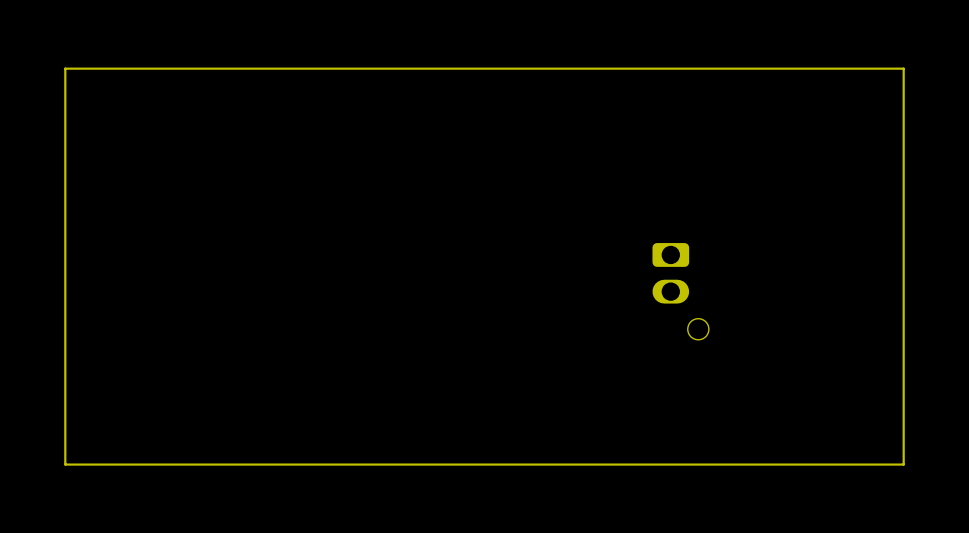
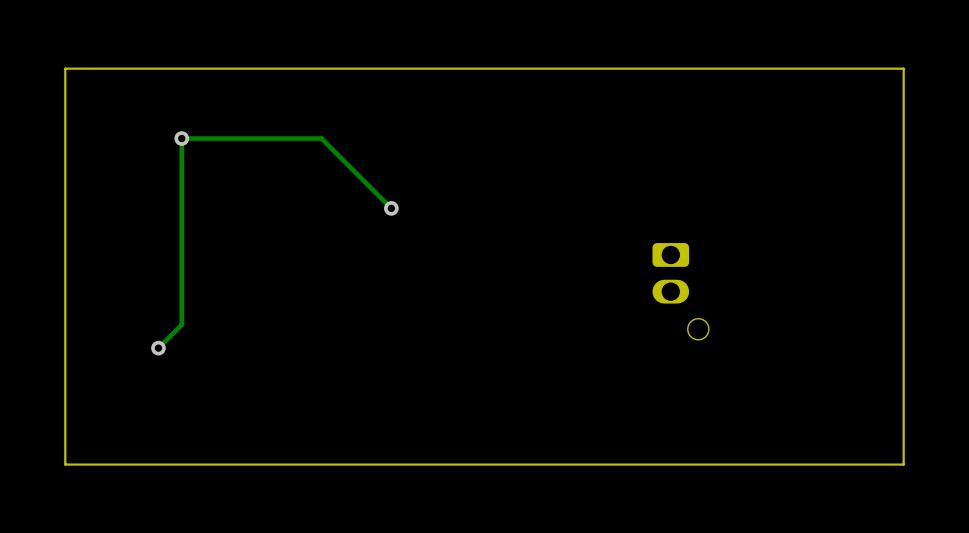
via: none -> (181, 138)
track: none -> (391, 208) (321, 138) (181, 138) (181, 324) (158, 348)
via: none -> (391, 208)
via: none -> (158, 348)

